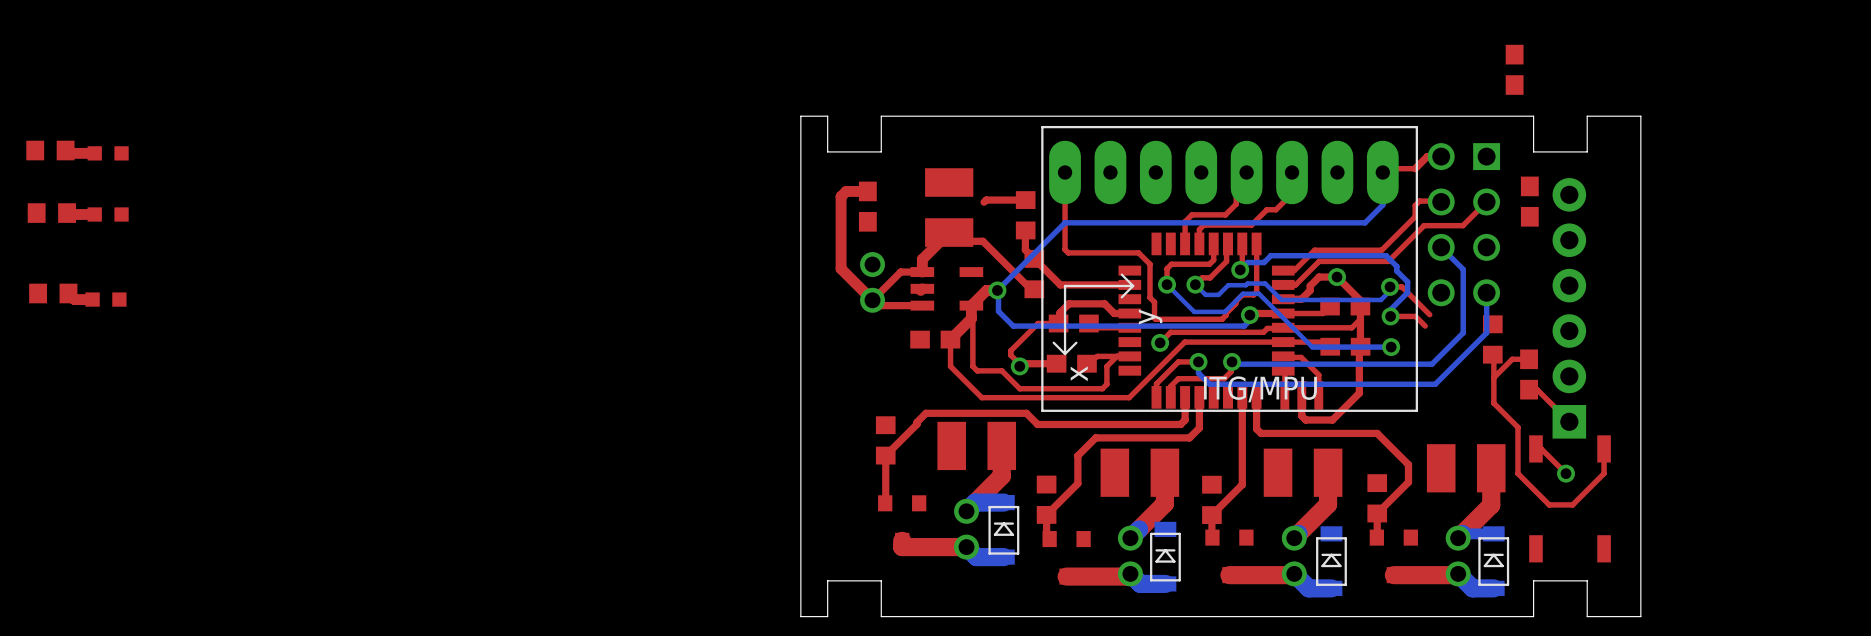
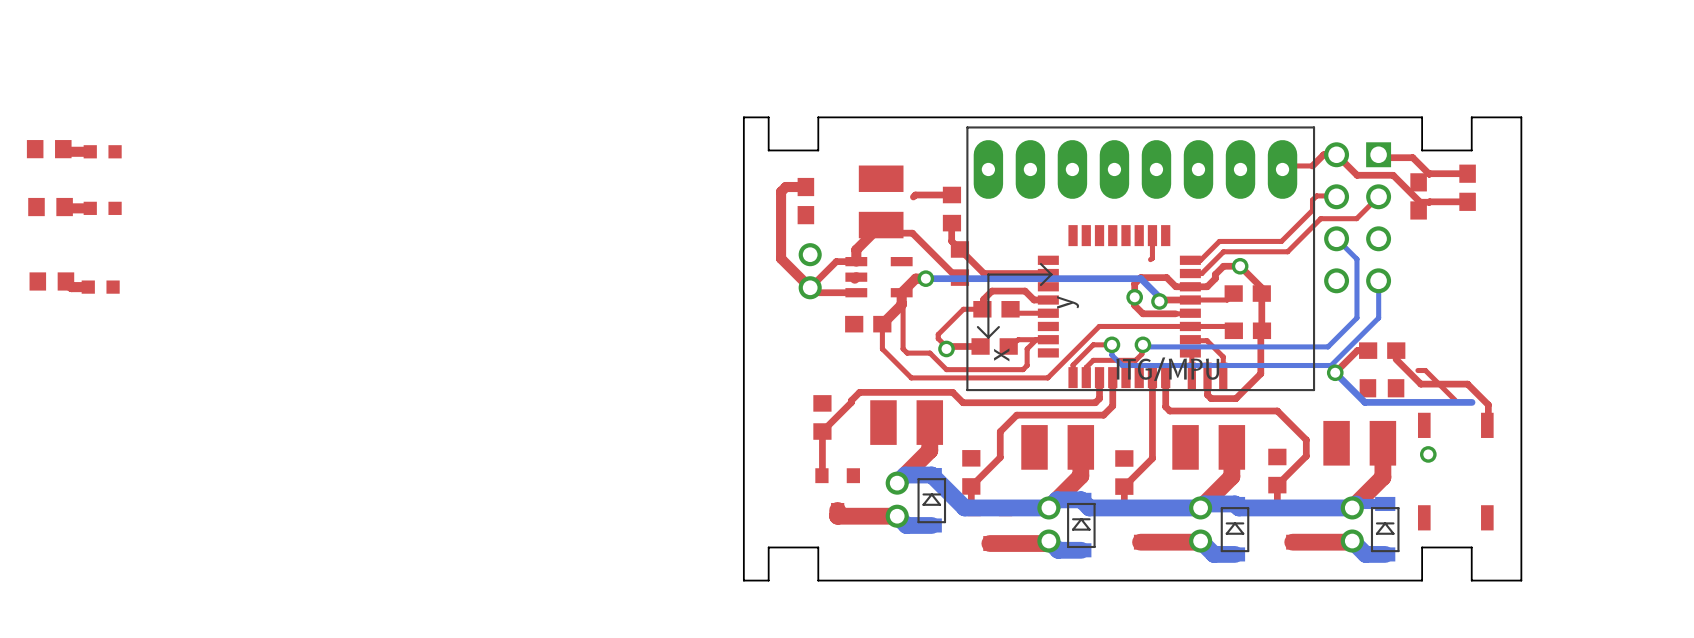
part: (1514, 69) -> none
top track: none -> (1336, 154) (1357, 175) (1393, 175) (1420, 202) (1467, 201)
top track: none -> (1381, 157) (1412, 157) (1429, 174)
top track: (1065, 172) (1065, 249) (1068, 252) (1138, 252) (1150, 264) (1150, 297) (1154, 302) (1155, 319) (1222, 319) (1242, 294) (1253, 294) (1256, 292) (1256, 244) -> none
top track: (1246, 172) (1236, 182) (1236, 204) (1225, 214) (1191, 214) (1185, 221) (1185, 243) -> none
top track: (1292, 172) (1292, 193) (1275, 209) (1266, 209) (1251, 225) (1203, 225) (1199, 229) (1199, 243) -> none
bottom track: (1382, 172) (1382, 205) (1365, 222) (1065, 222) -> none
top track: none -> (1467, 173) (1429, 174)
part: none -> (1467, 187)
bottom track: (1065, 222) (997, 290) (998, 311) (1013, 326) (1244, 326) (1249, 320) (1249, 315) -> none
top track: (1213, 243) (1213, 260) (1209, 264) (1171, 264) (1167, 268) (1167, 284) -> none
top track: (1227, 243) (1226, 261) (1210, 277) (1202, 277) (1195, 284) -> none
bottom track: (1240, 269) (1247, 262) (1264, 262) (1270, 255) (1386, 255) (1407, 281) (1407, 292) (1390, 309) (1390, 316) -> none
via: (1240, 269) -> none
bottom track: (1167, 284) (1194, 311) (1224, 311) (1243, 293) (1258, 293) (1312, 347) (1391, 347) -> none
via: (1167, 284) -> none
bottom track: (1195, 284) (1205, 294) (1218, 294) (1228, 285) (1265, 283) (1281, 299) (1380, 299) (1390, 290) (1390, 286) -> none
via: (1195, 284) -> none
top track: (1390, 286) (1401, 286) (1429, 314) -> none
via: (1390, 286) -> none
bottom track: none -> (925, 278) (1140, 278) (1159, 297)
part: (1569, 308) -> none
via: none -> (1134, 297)
top track: (1390, 316) (1415, 316) (1425, 326) -> none
via: (1390, 316) -> none
top track: (1360, 319) (1351, 327) (1283, 327) -> none
top track: (1267, 328) (1263, 332) (1170, 332) (1160, 342) -> (1175, 313) (1142, 313) (1134, 305) (1134, 283) (1140, 277) (1166, 277) (1175, 286) (1190, 286)
part rotation: 0° (1492, 339) -> 90° clockwise (1381, 388)
part position: (1492, 339) -> (1381, 388)
via: (1160, 342) -> none
via: (1391, 347) -> none
top track: (1492, 354) (1493, 403) (1517, 427) (1517, 473) (1549, 504) (1572, 504) (1604, 473) (1604, 448) -> none
top track: (1529, 359) (1512, 359) (1493, 377) -> none
top track: none -> (1368, 350) (1357, 350) (1335, 372)
part rotation: 0° (1529, 374) -> 90° clockwise (1382, 350)
part position: (1529, 374) -> (1382, 350)
top track: none -> (1396, 359) (1420, 384) (1467, 384) (1488, 404) (1489, 416)
bottom track: none -> (1335, 372) (1364, 402) (1472, 402)
via: none -> (1335, 372)
top track: (1535, 448) (1541, 448) (1565, 473) -> none
via position: (1565, 473) -> (1428, 454)
bottom track: none -> (931, 475) (964, 507) (1048, 507)
bottom track: none -> (1057, 499) (1081, 499) (1089, 507) (1200, 507)
bottom track: none -> (1204, 503) (1235, 503) (1238, 507) (1352, 507)

